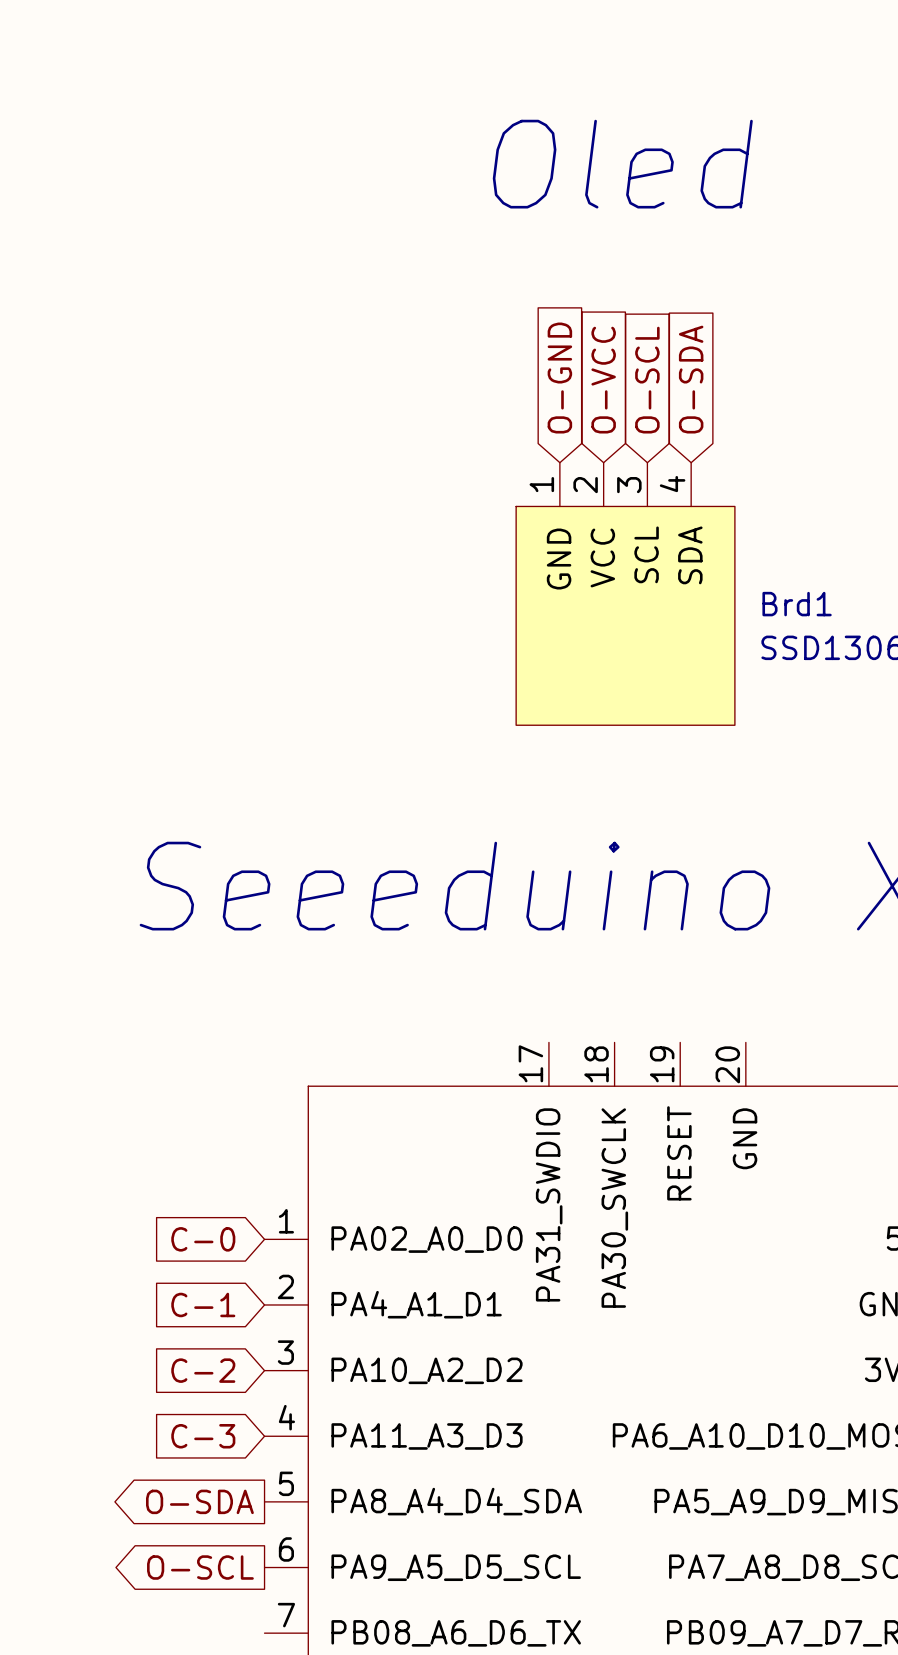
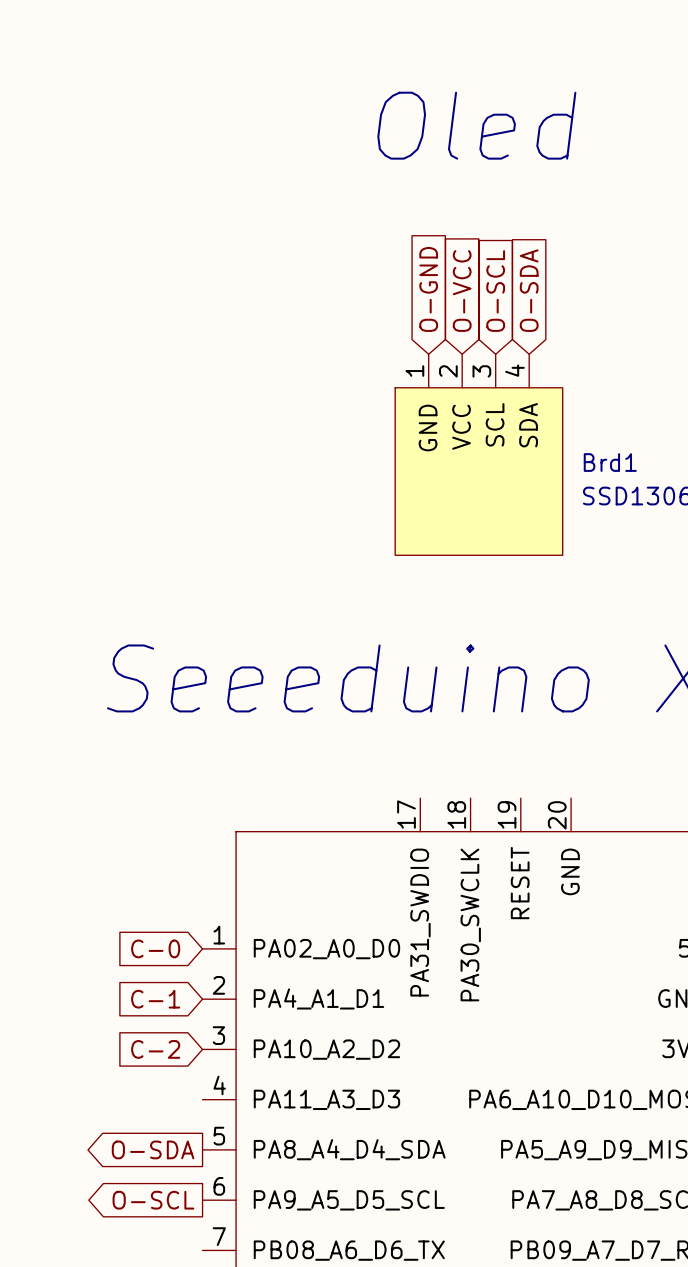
global label: C-3 (203, 1436) -> none

